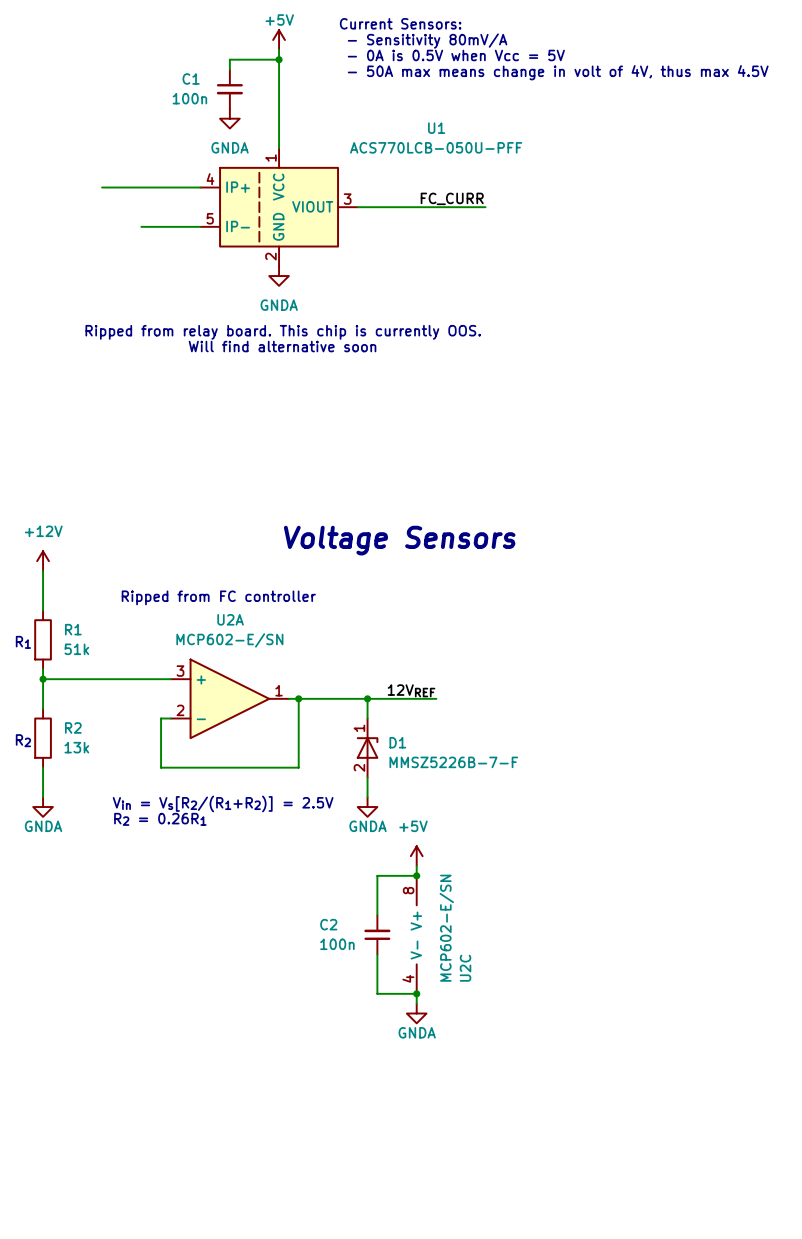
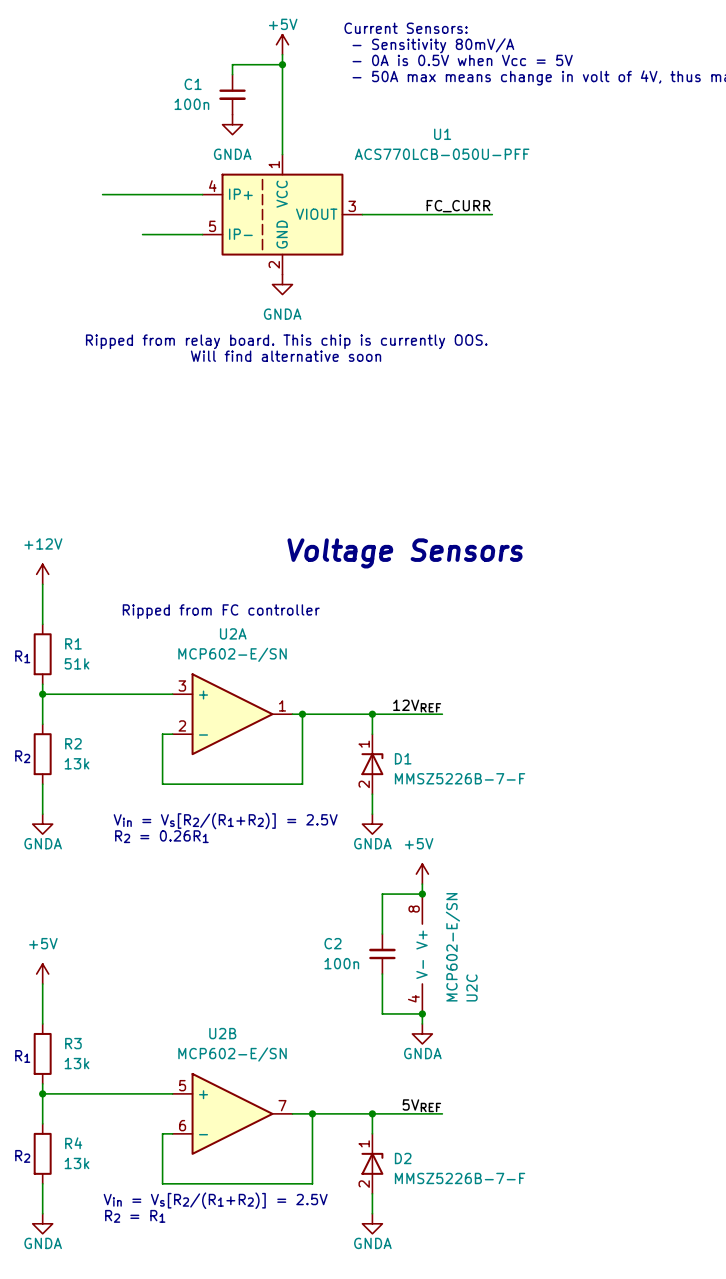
power symbol: none -> +5V (42, 974)
wire: none -> (42, 983) (42, 1023)
R3: none -> 13k (42, 1053)
text: none -> R1 (22, 1056)
wire: none -> (42, 1083) (42, 1123)
wire: none -> (42, 1093) (172, 1093)
junction: none -> (42, 1093)
label: none -> 5VREF (421, 1105)
U2B: none -> MCP602-E/SN (232, 1113)
wire: none -> (292, 1113) (442, 1113)
wire: none -> (312, 1113) (312, 1183) (162, 1183) (162, 1133) (172, 1133)
junction: none -> (312, 1113)
wire: none -> (372, 1113) (372, 1133)
junction: none -> (372, 1113)
R4: none -> 13k (42, 1153)
text: none -> R2 (22, 1156)
D2: none -> MMSZ5226B-7-F (372, 1163)
wire: none -> (42, 1183) (42, 1213)
wire: none -> (372, 1193) (372, 1213)
text: none -> Vin = Vs[R2/(R1+R2)] = 2.5V (215, 1200)
text: none -> R2 = R1 (135, 1216)
power symbol: none -> GNDA (42, 1223)
power symbol: none -> GNDA (372, 1223)

